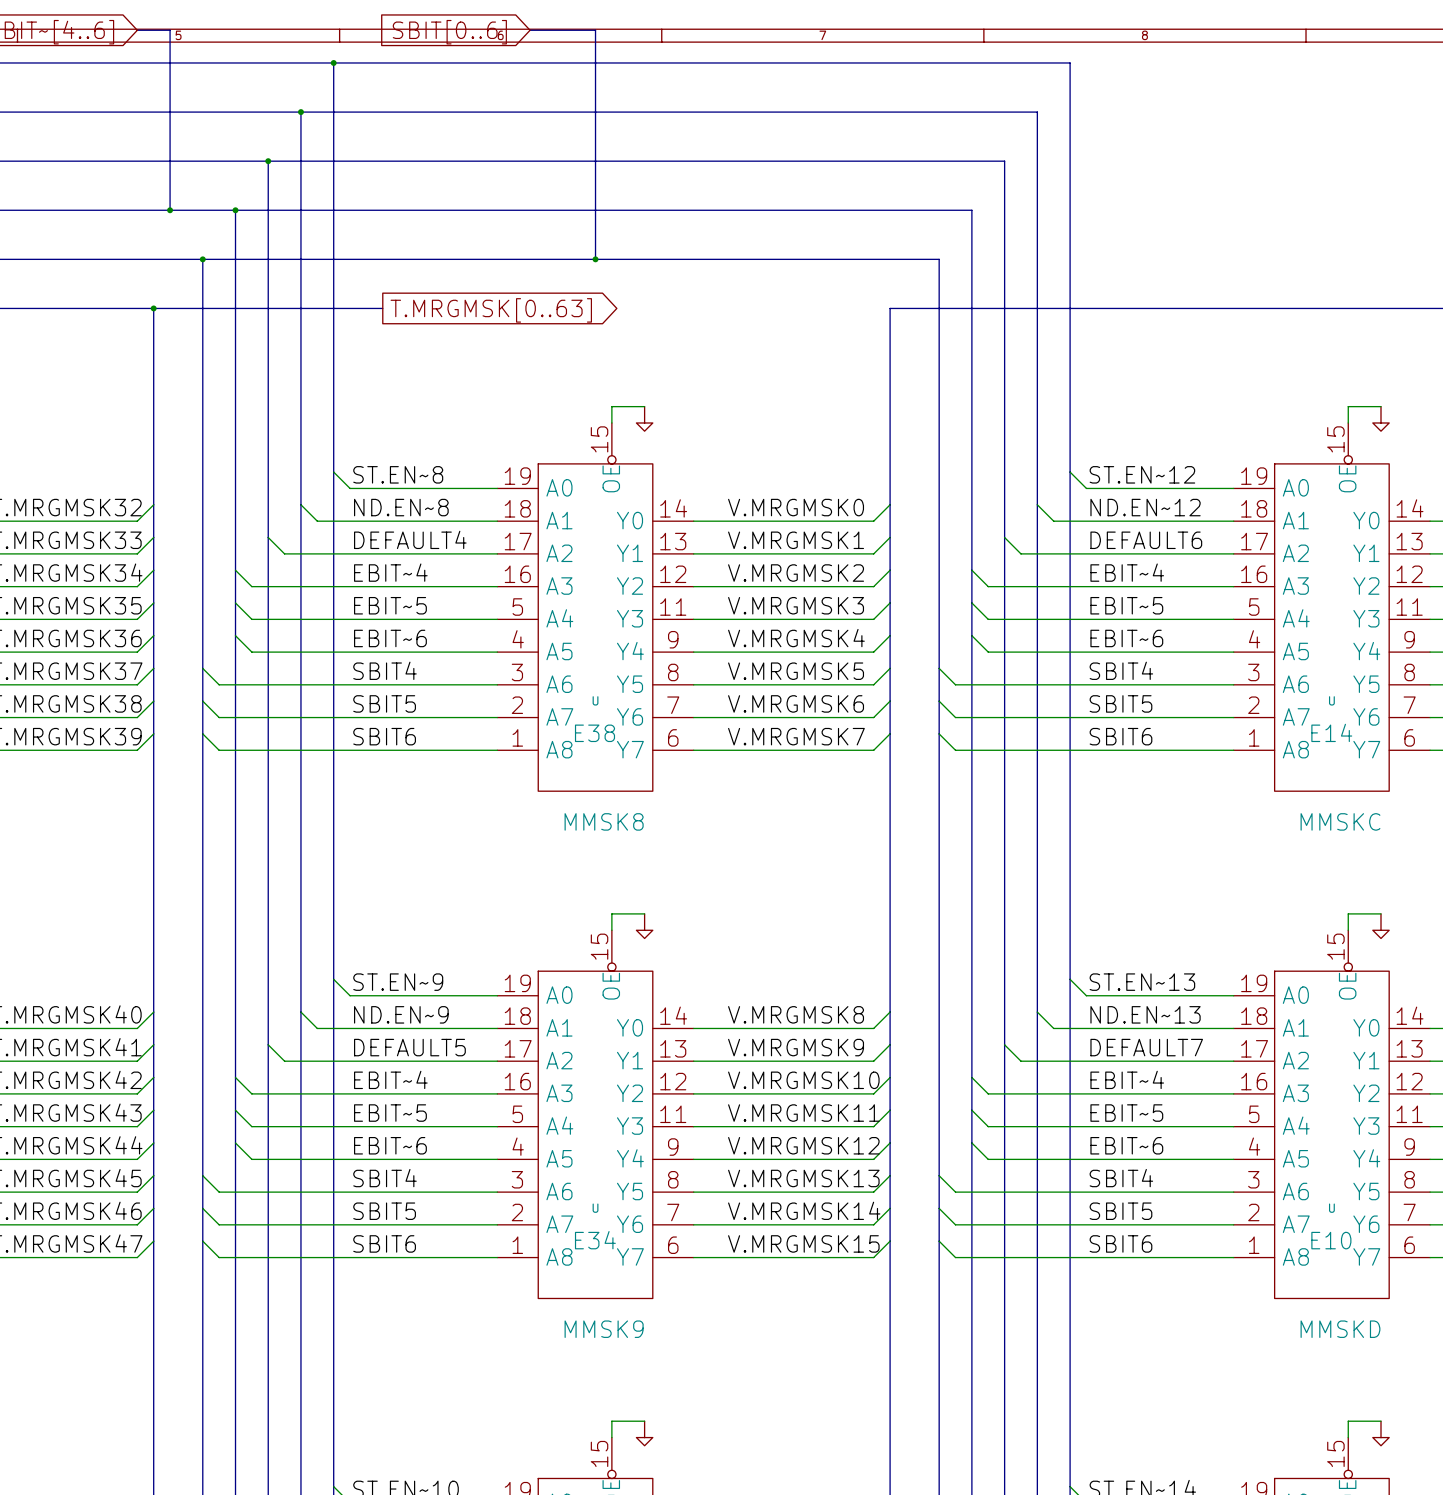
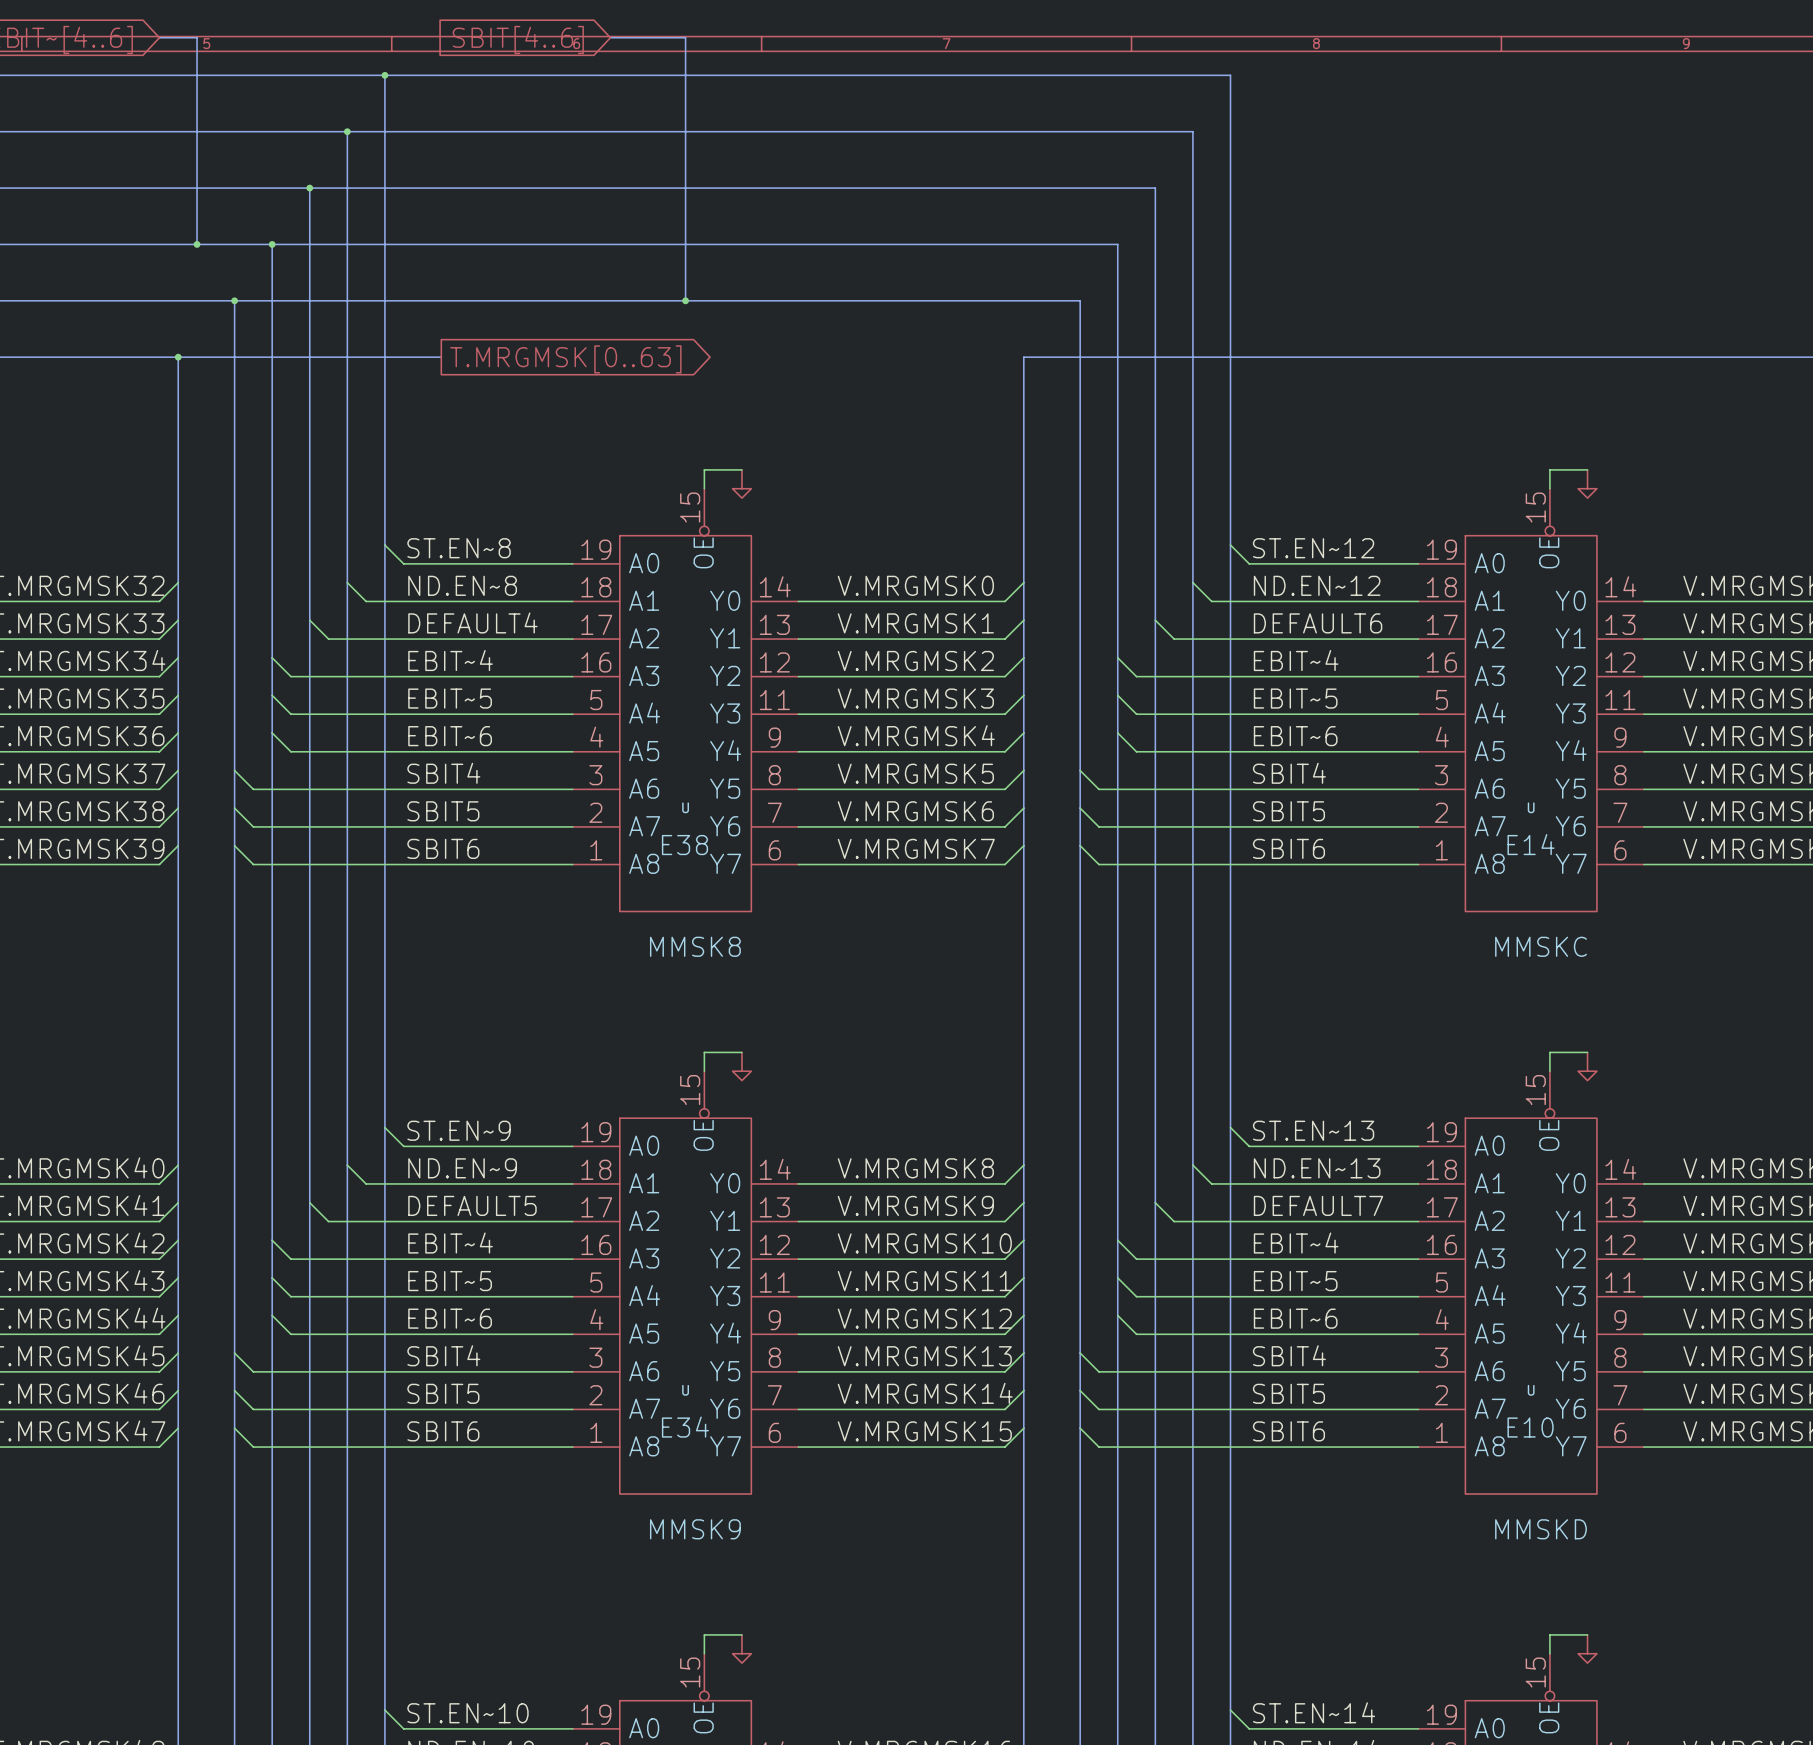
global label: SBIT[0..6] (449, 32) -> SBIT[4..6] (518, 39)

